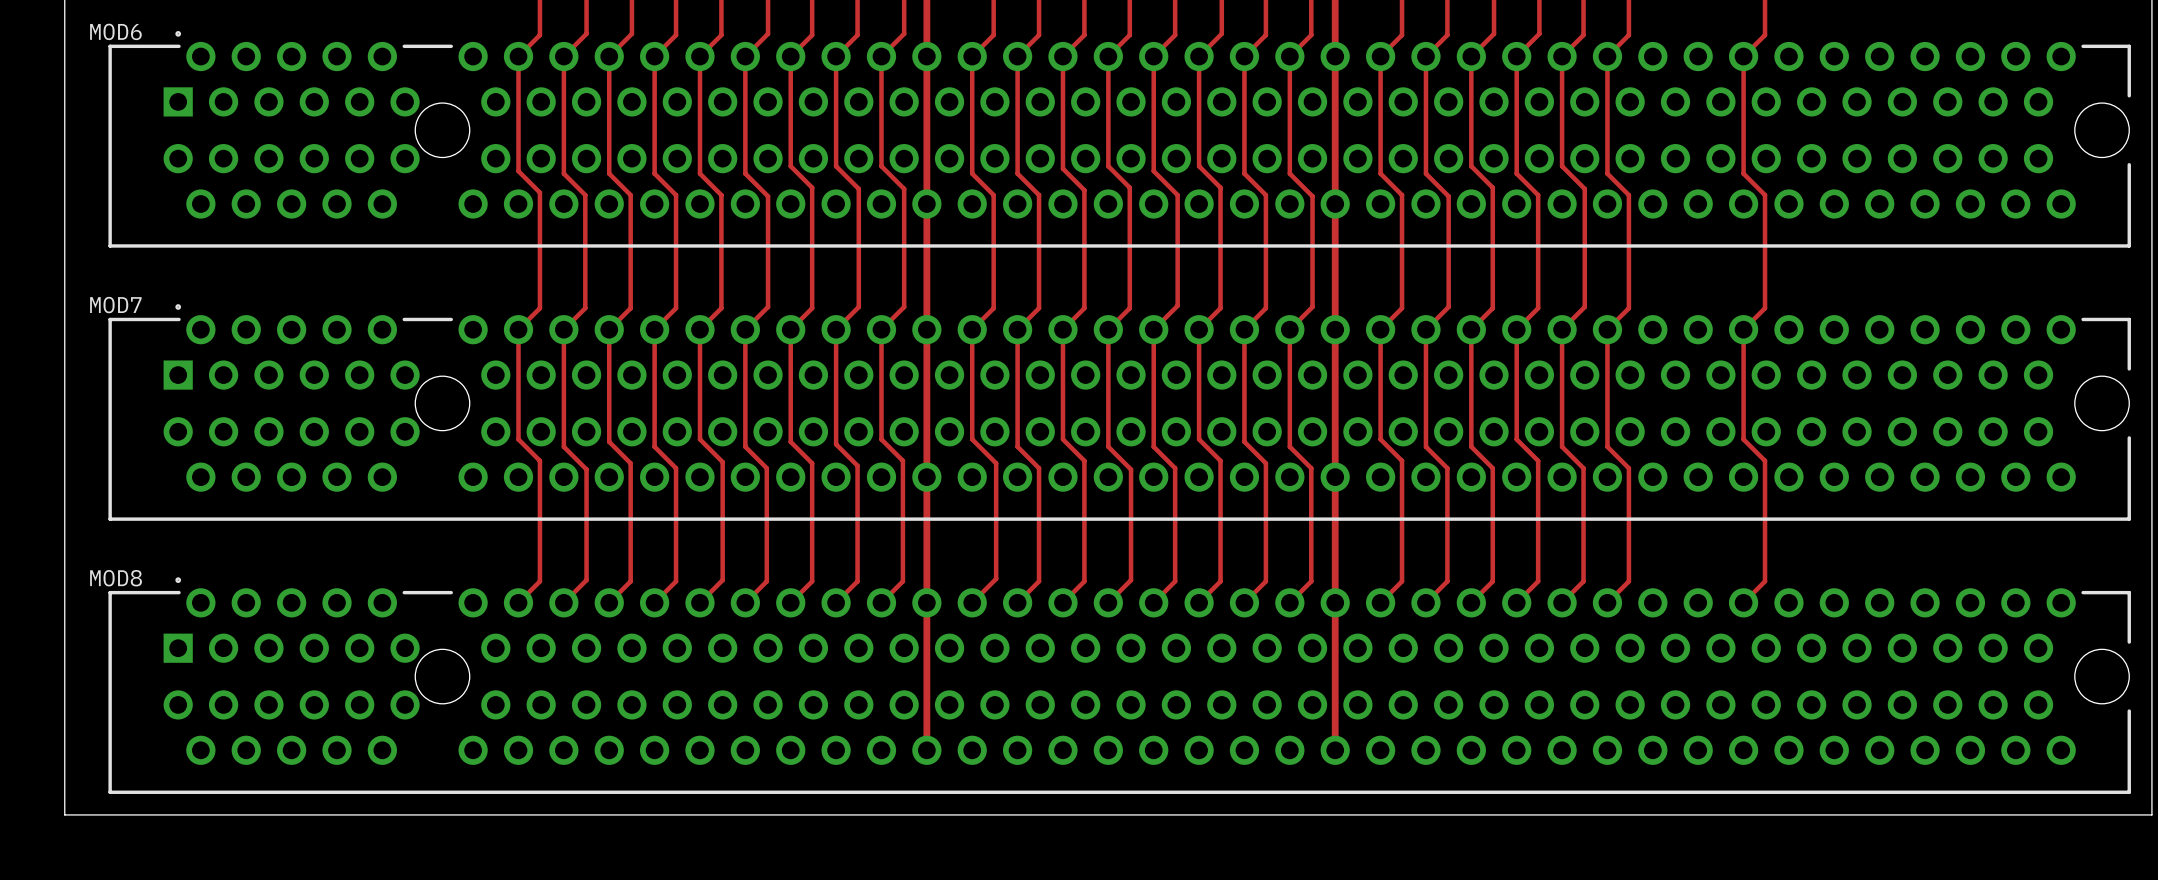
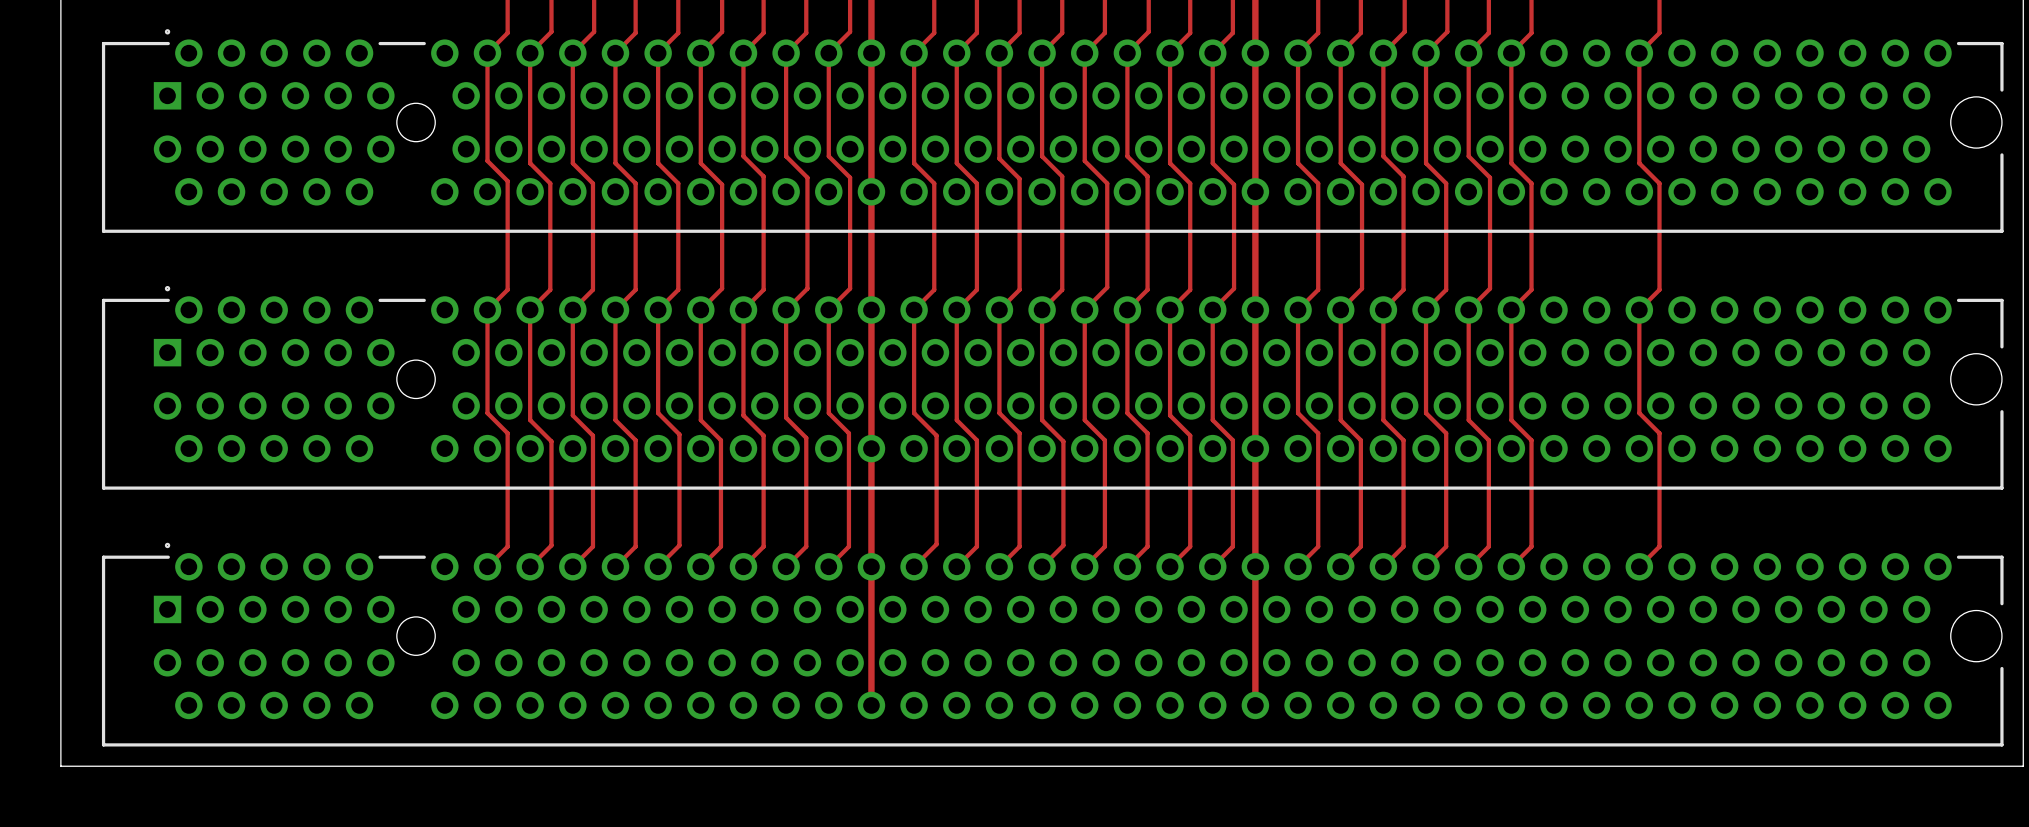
MOD6: (1119, 139) -> none
part: none -> (1052, 131)
MOD7: (1119, 412) -> none
part: none -> (1052, 387)
MOD8: (1119, 685) -> none
part: none -> (1052, 644)

